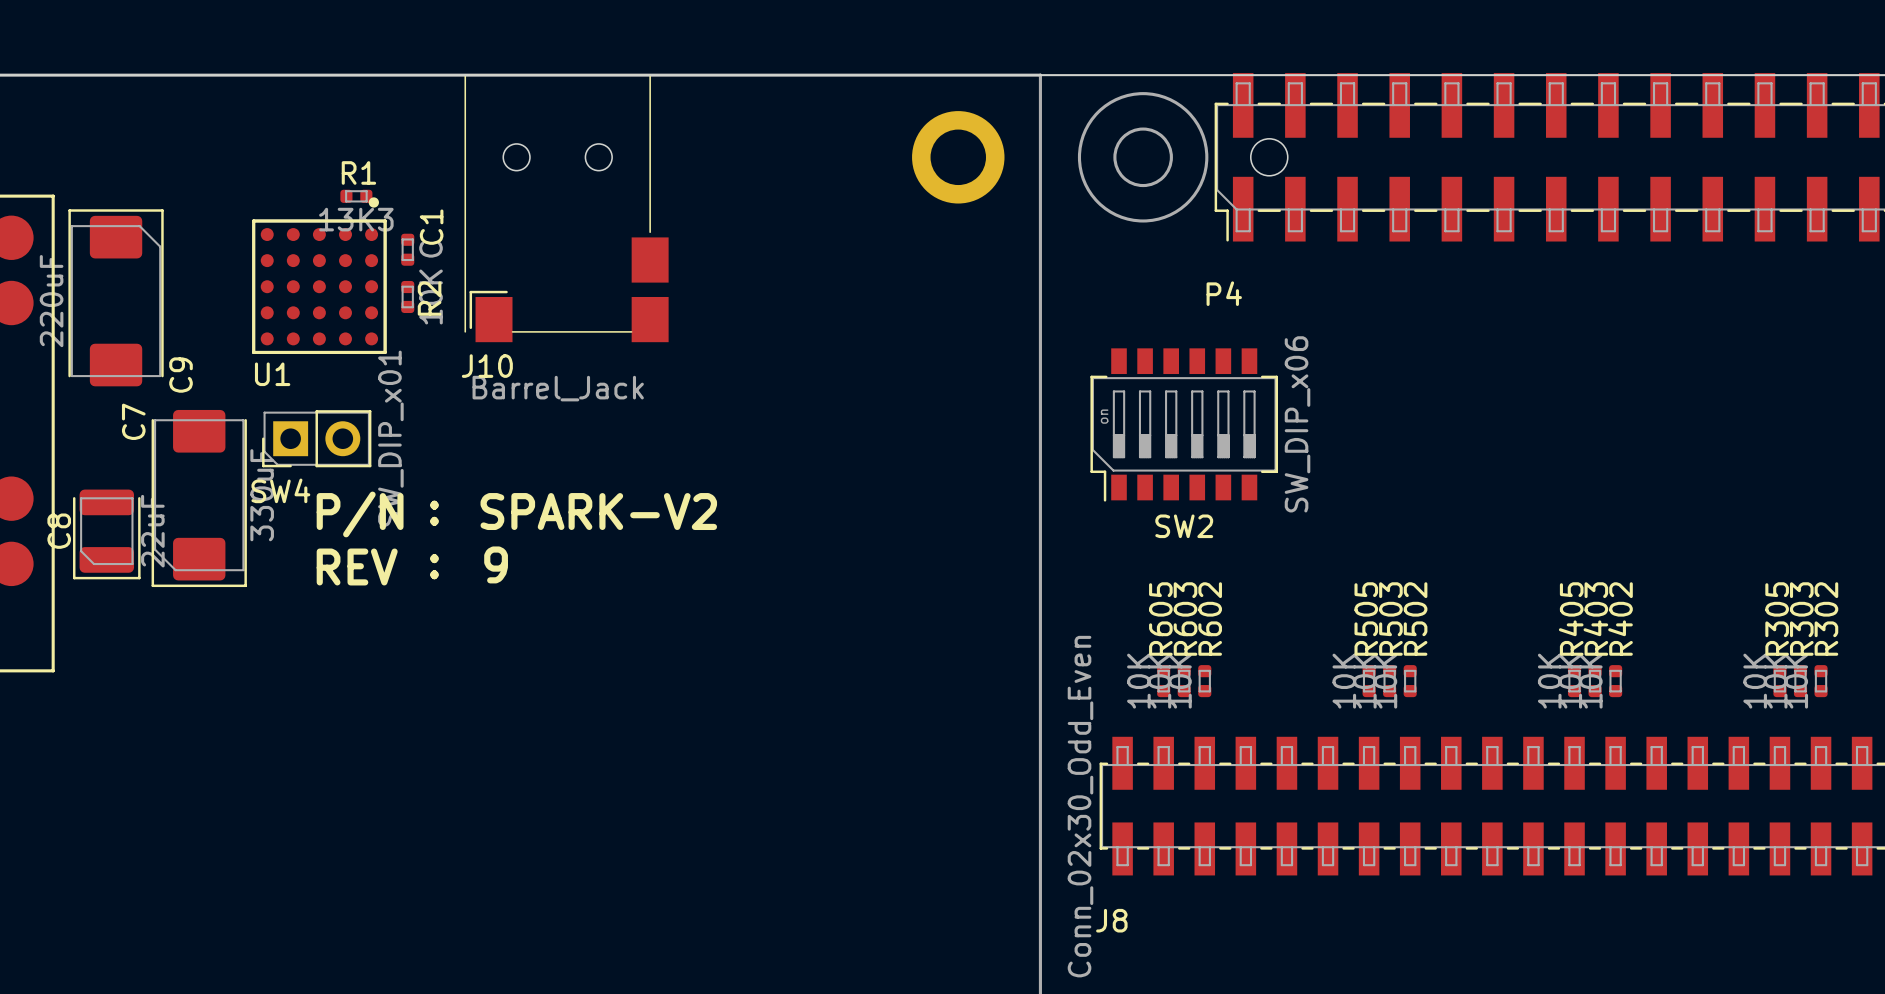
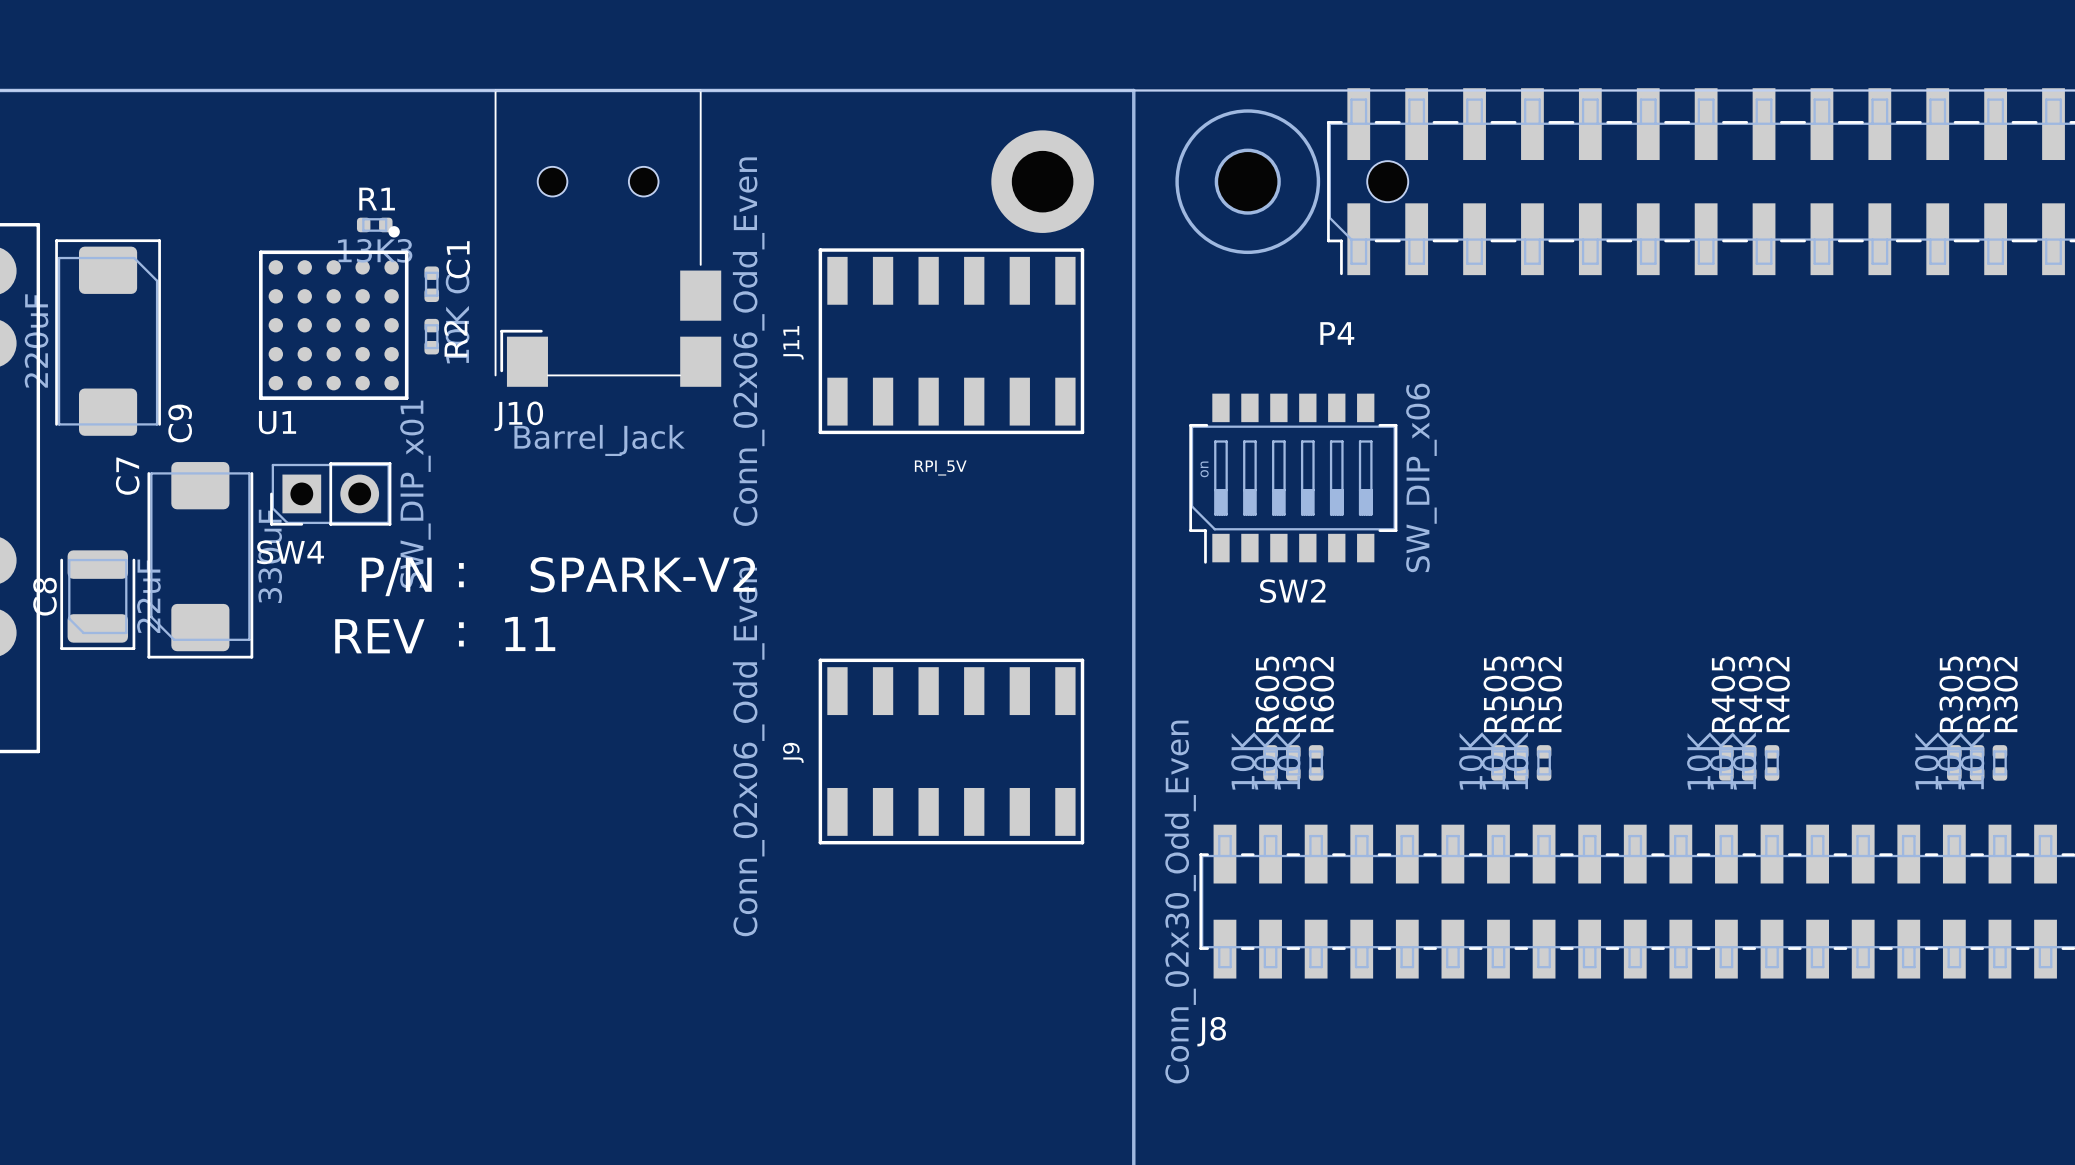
J11: none -> Conn_02x06_Odd_Even (951, 341)
text: none -> RPI_5V (940, 468)
text: 9 (496, 564) -> 11 (530, 633)
J9: none -> Conn_02x06_Odd_Even (951, 751)

